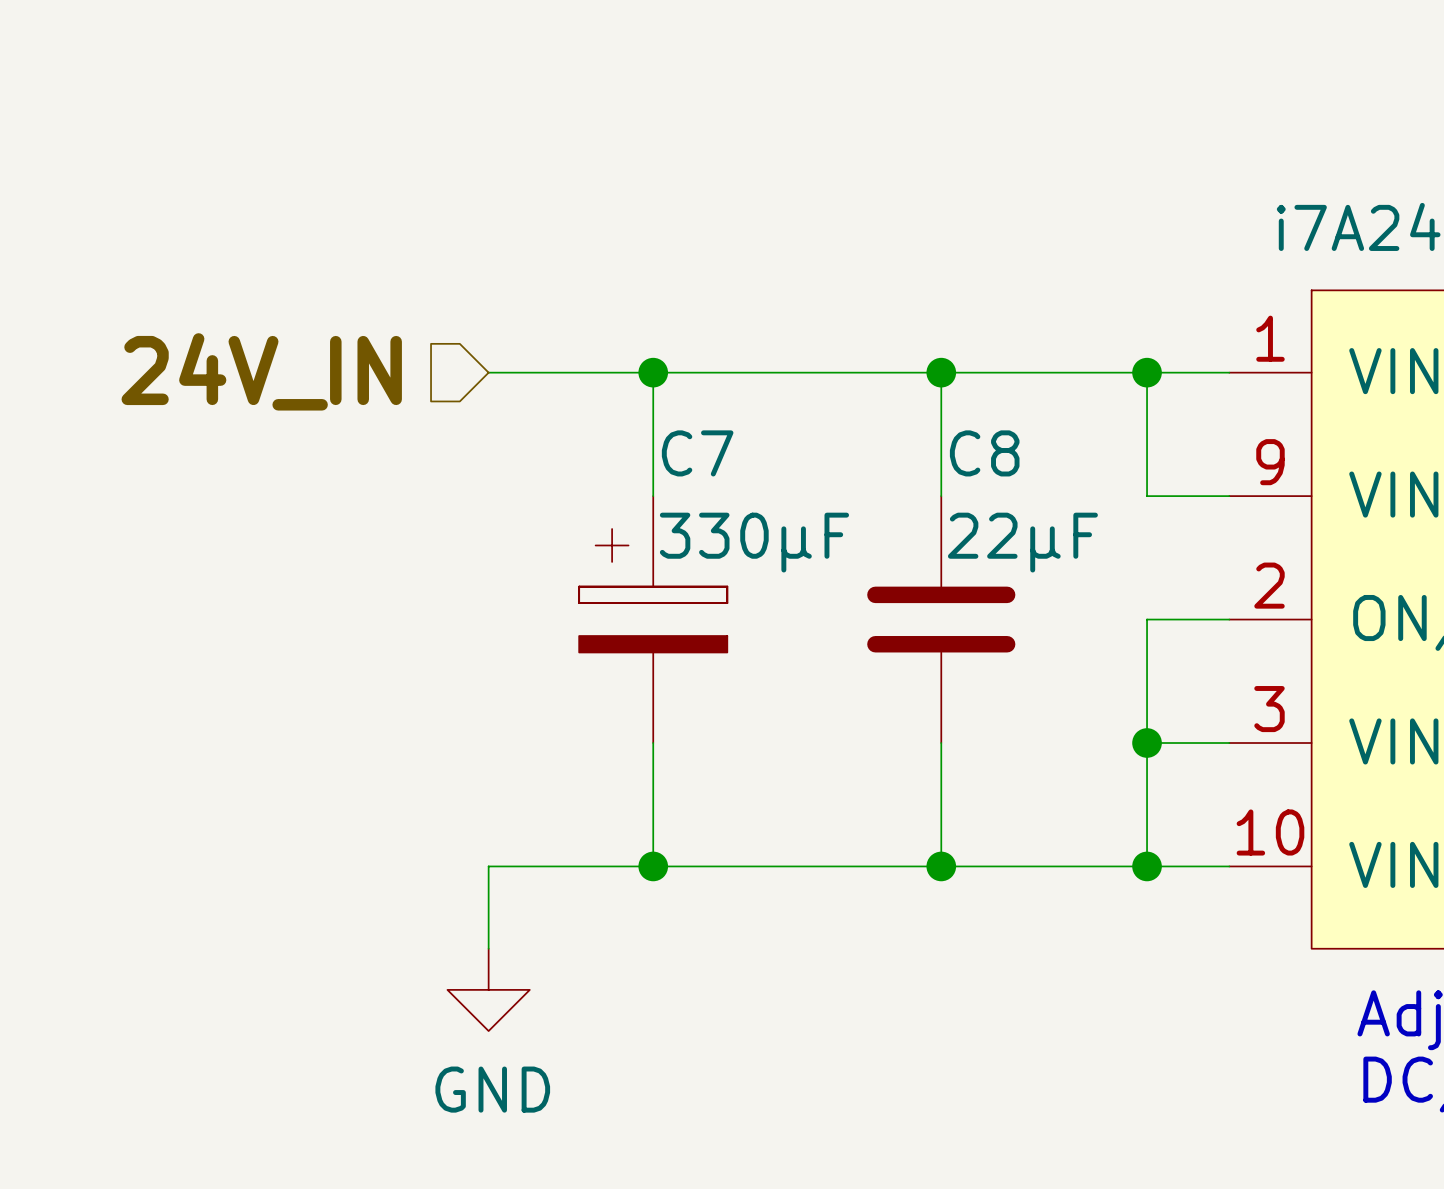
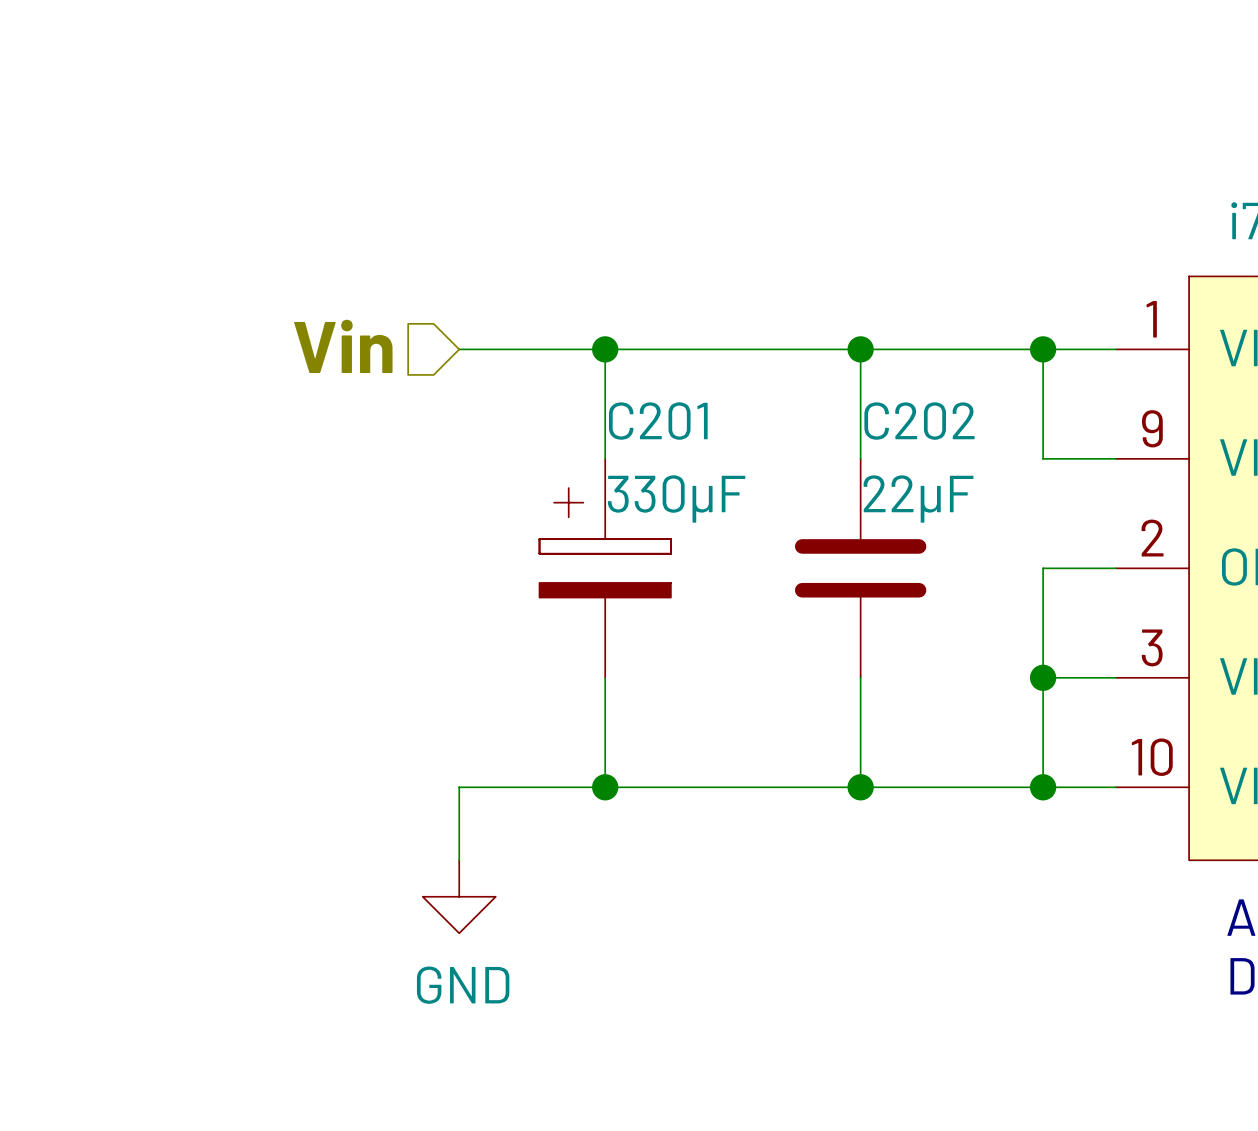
hierarchical label: 24V_IN (261, 371) -> Vin (343, 346)
C7 name: C7 (697, 453) -> C201 (658, 421)
C8 name: C8 (984, 453) -> C202 (919, 421)

